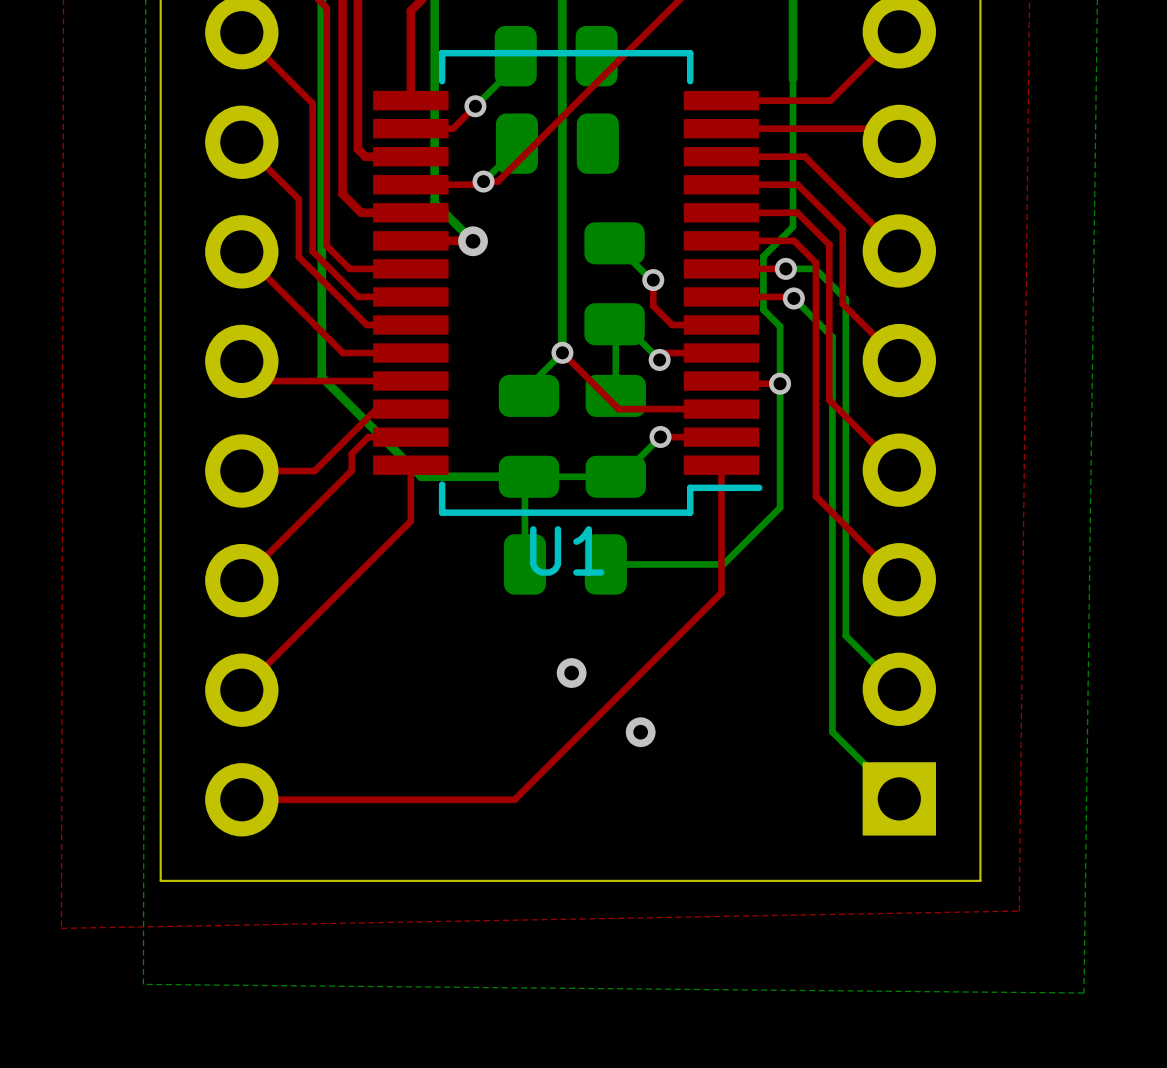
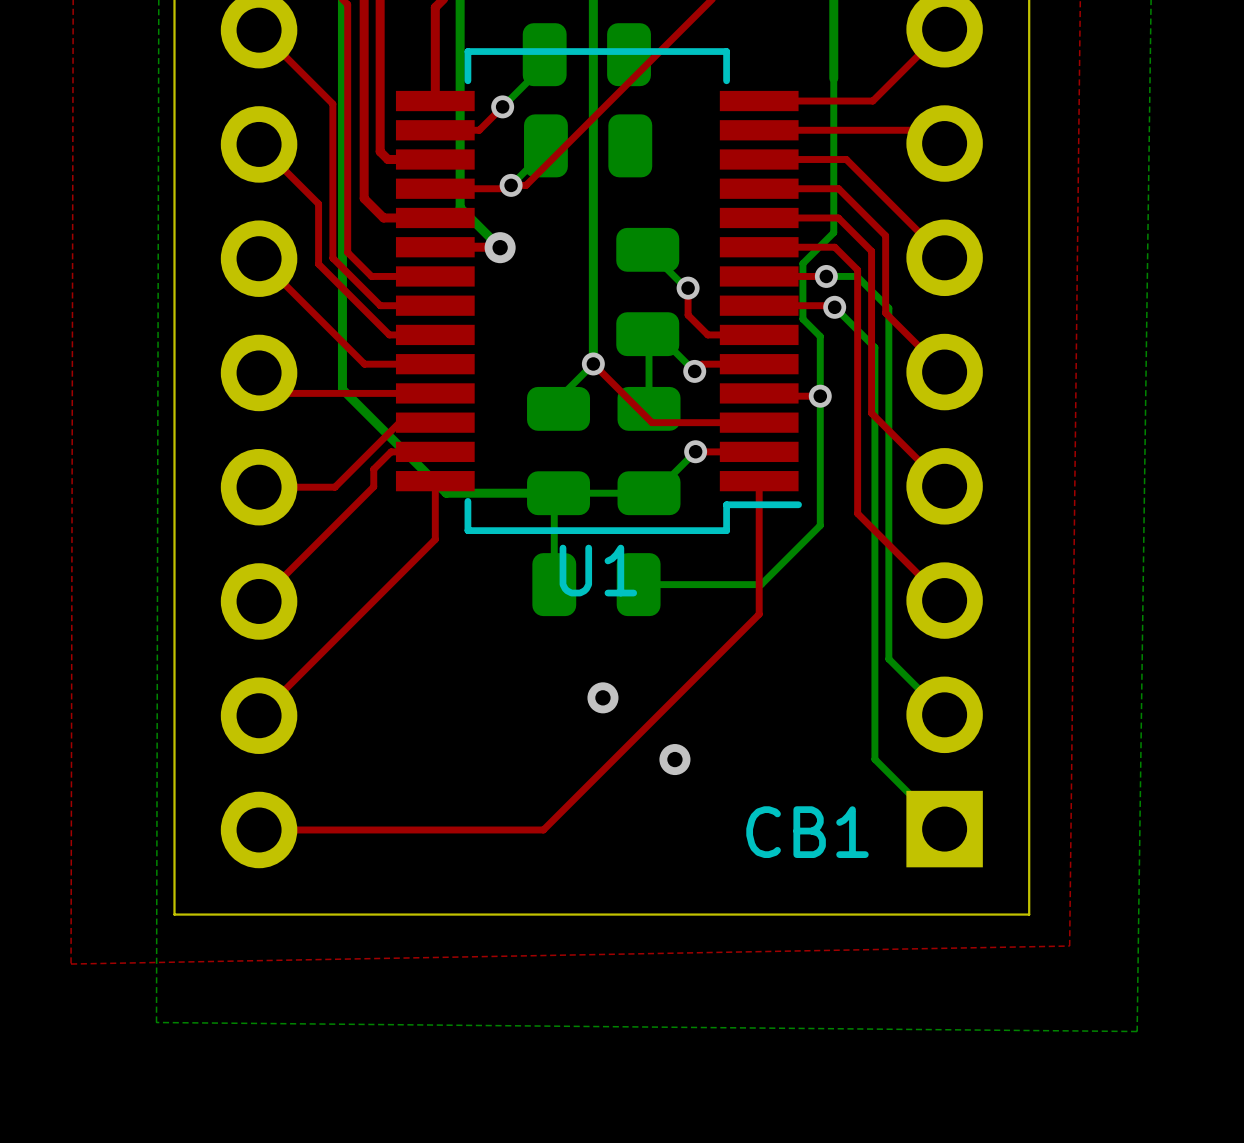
text: none -> CB1 (807, 832)

